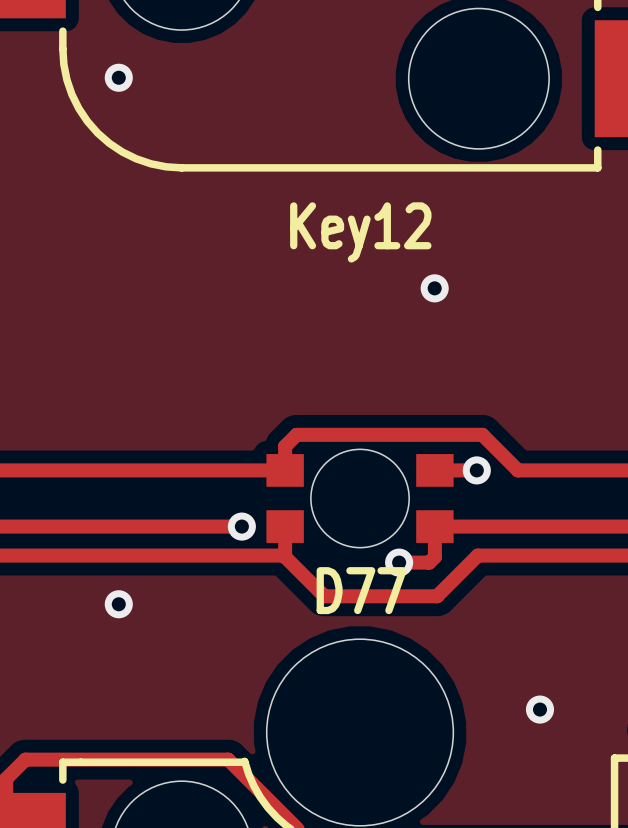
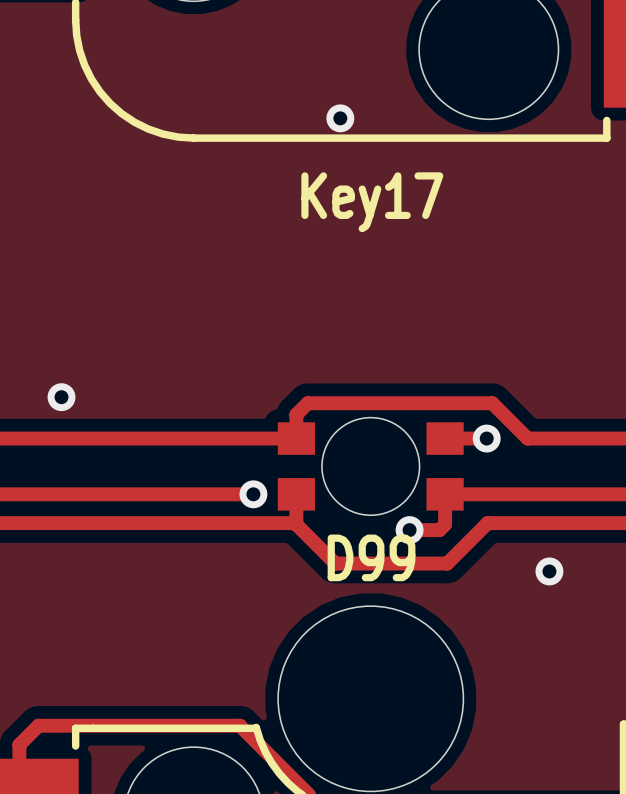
via: (118, 77) -> none
via: none -> (340, 118)
Key12 name: Key12 (360, 232) -> Key17 (372, 202)
via: (434, 288) -> none
via: none -> (61, 397)
D77 name: D77 (361, 590) -> D99 (371, 557)
via: (118, 604) -> none
via position: (539, 709) -> (549, 571)

